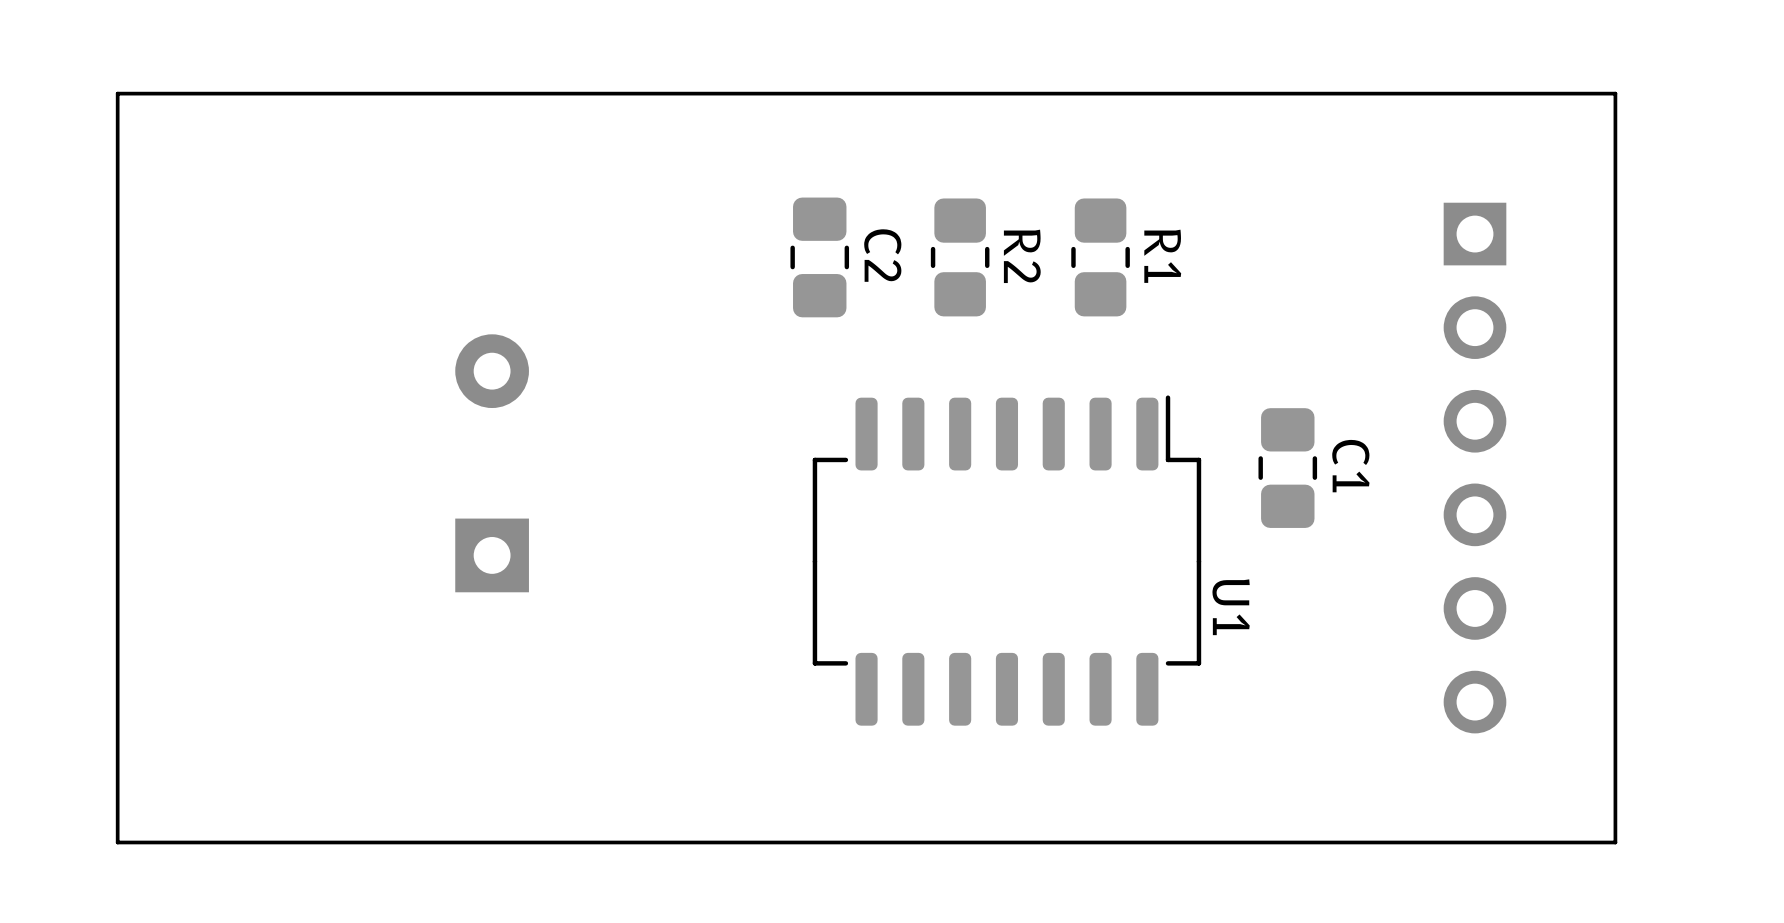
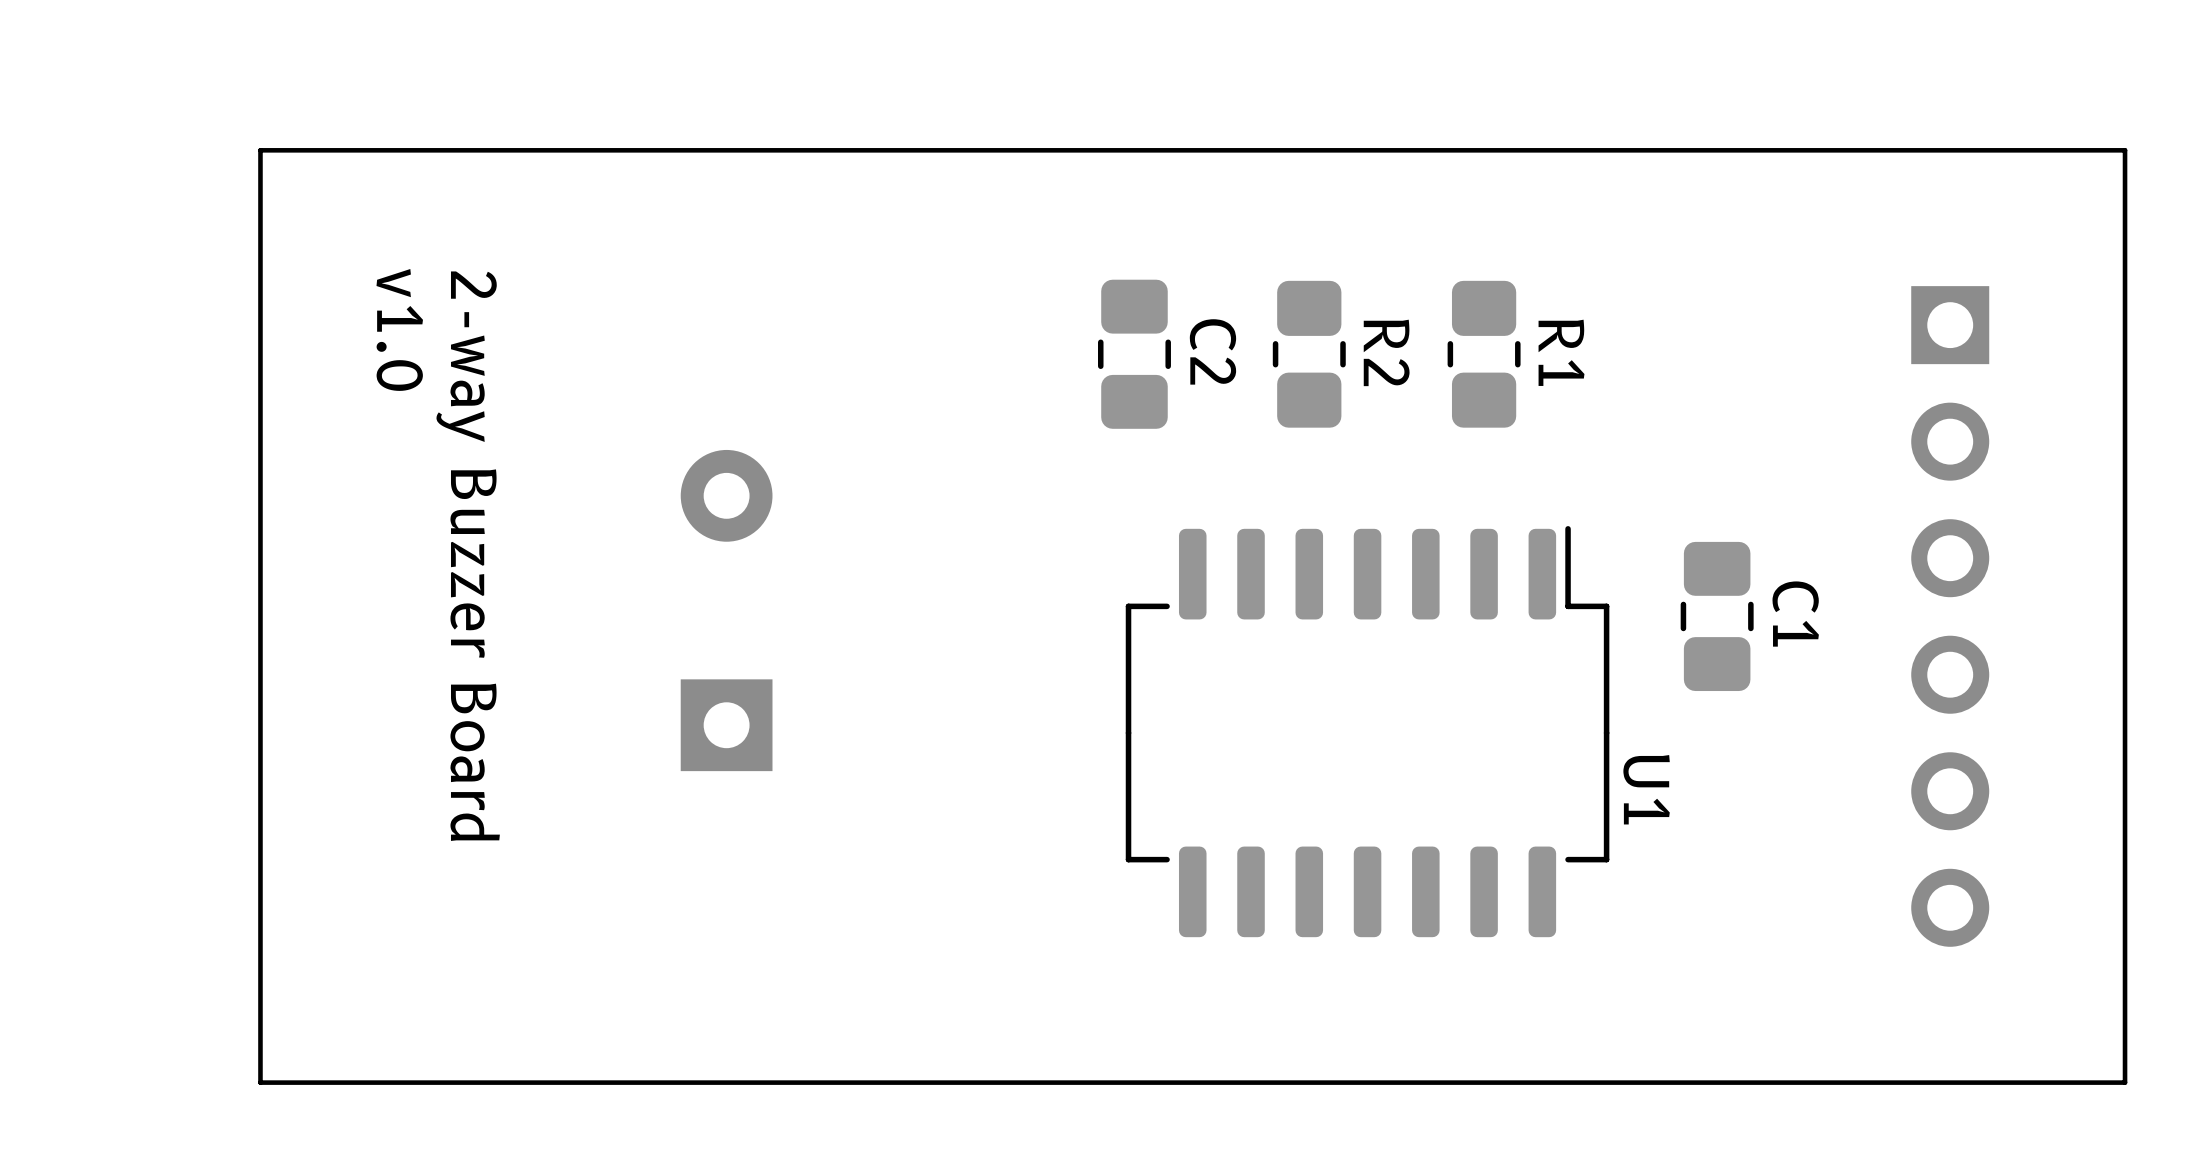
text: none -> v1.0 (399, 329)
text: none -> 2-way Buzzer Board (468, 556)

